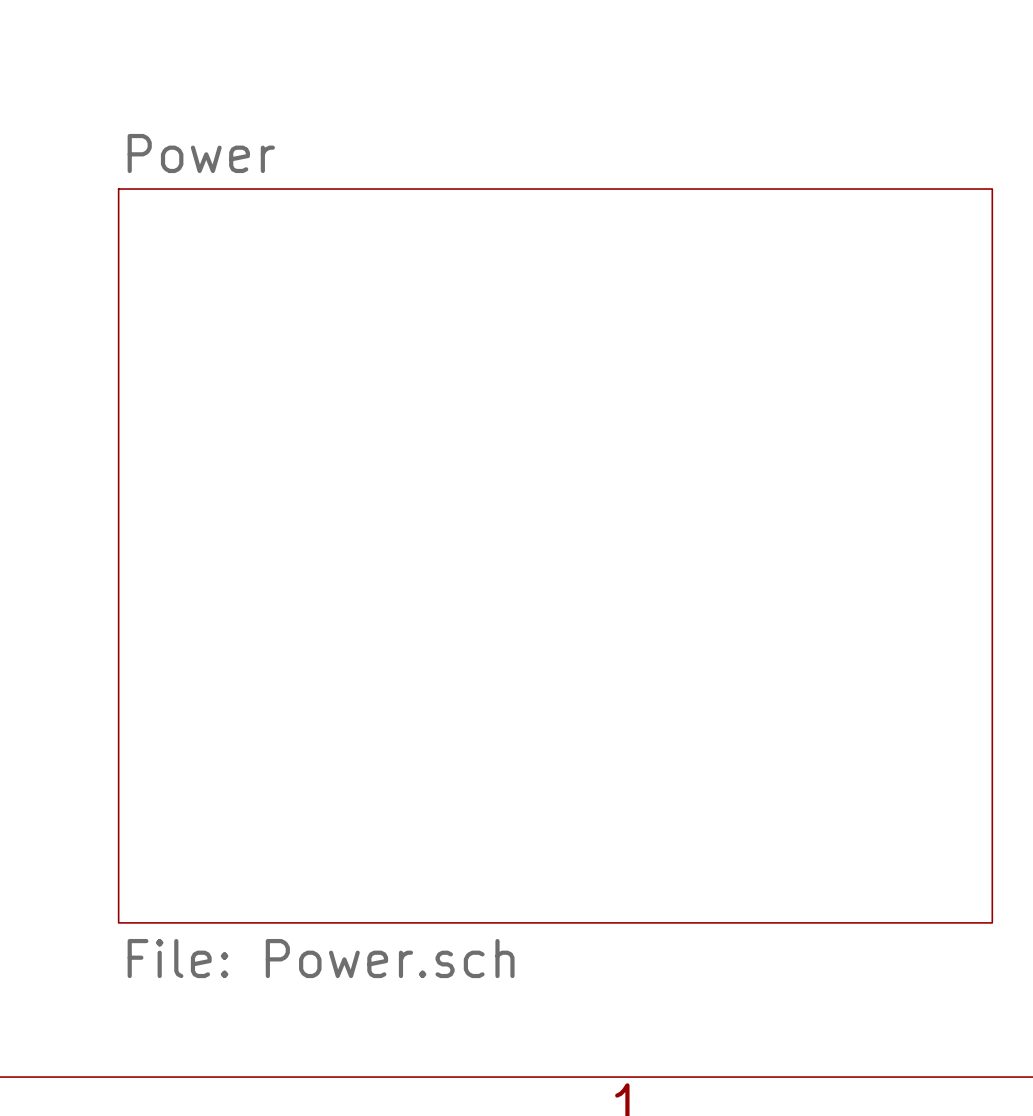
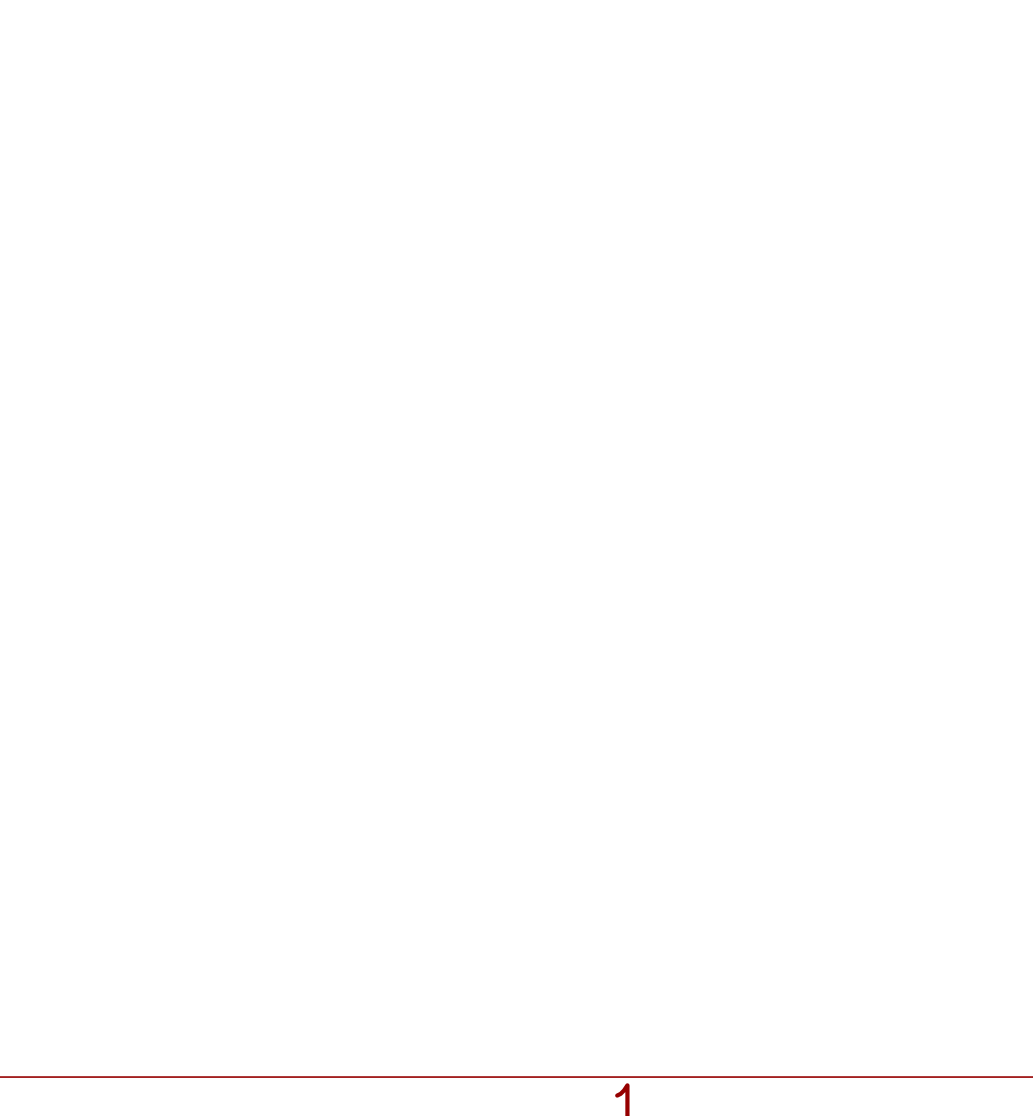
sheet Power: File: Power.sch (555, 555) -> none

